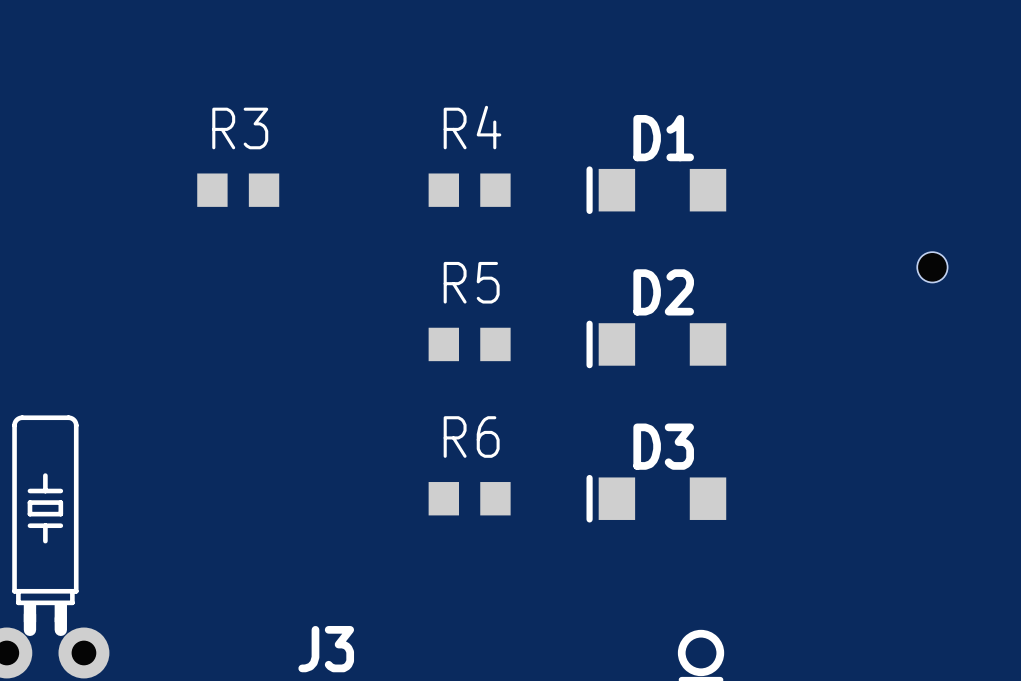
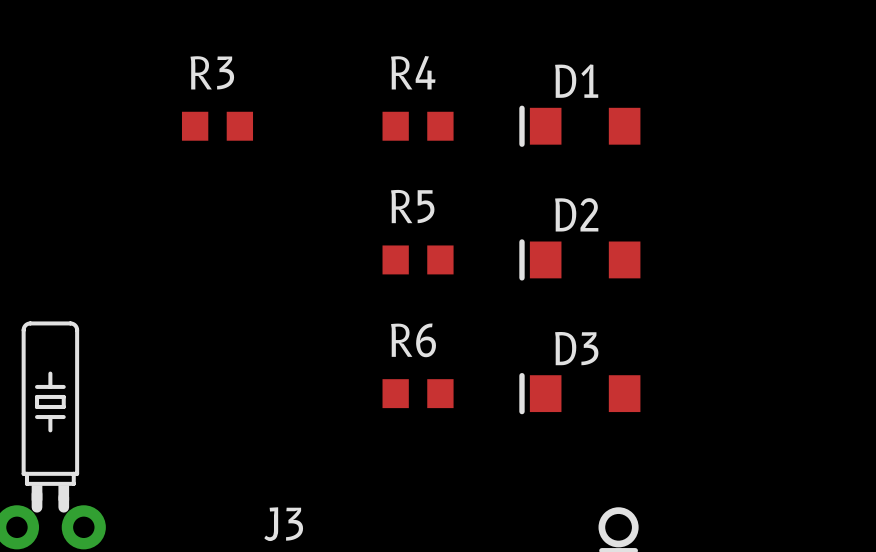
hole: (932, 267) -> none

